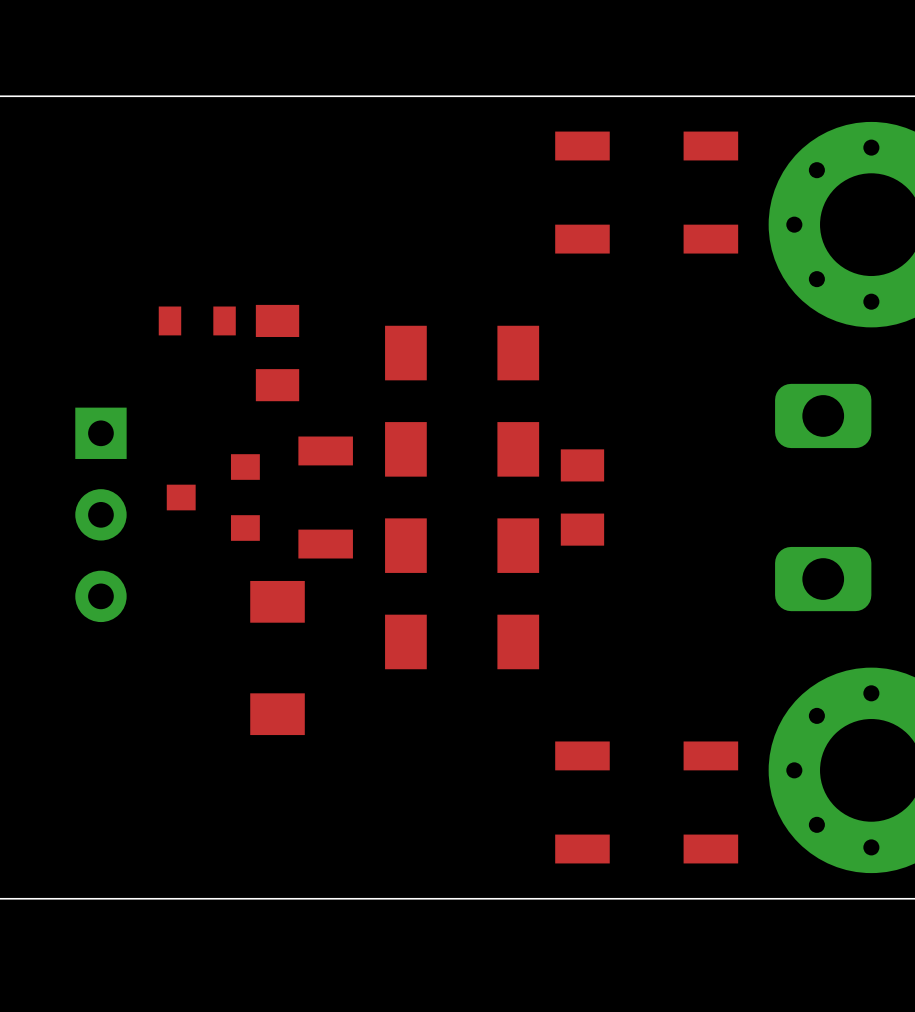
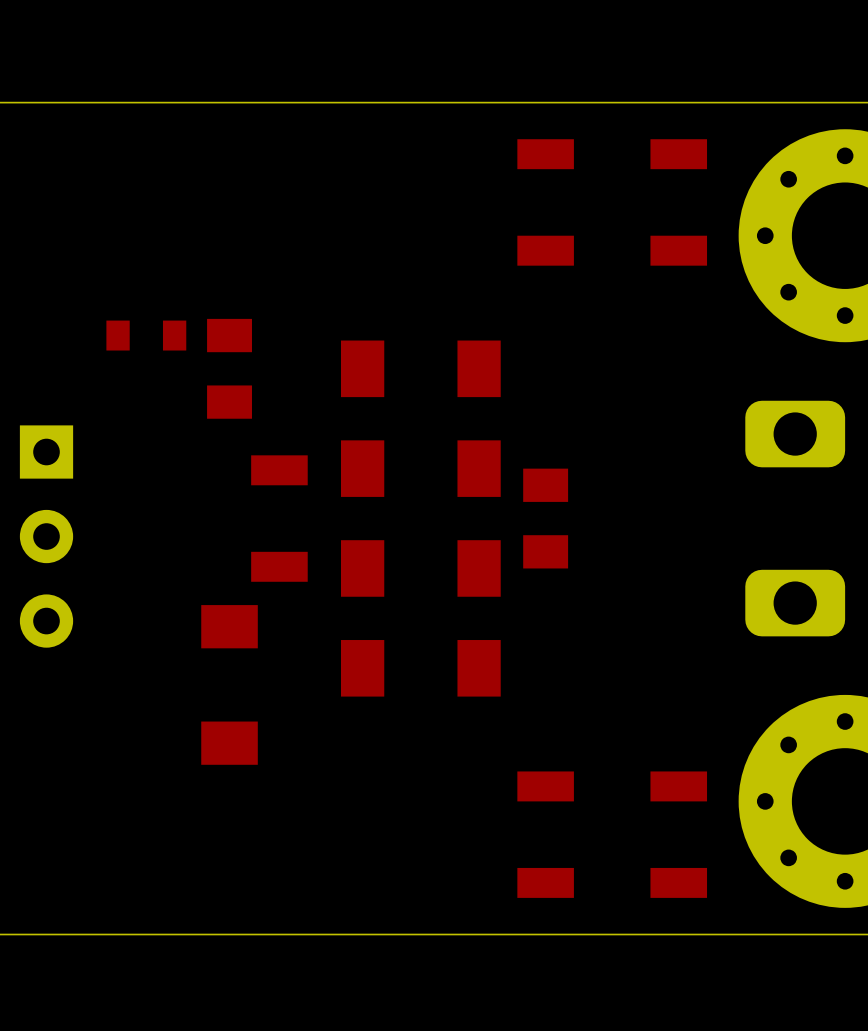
part: (213, 497) -> none

